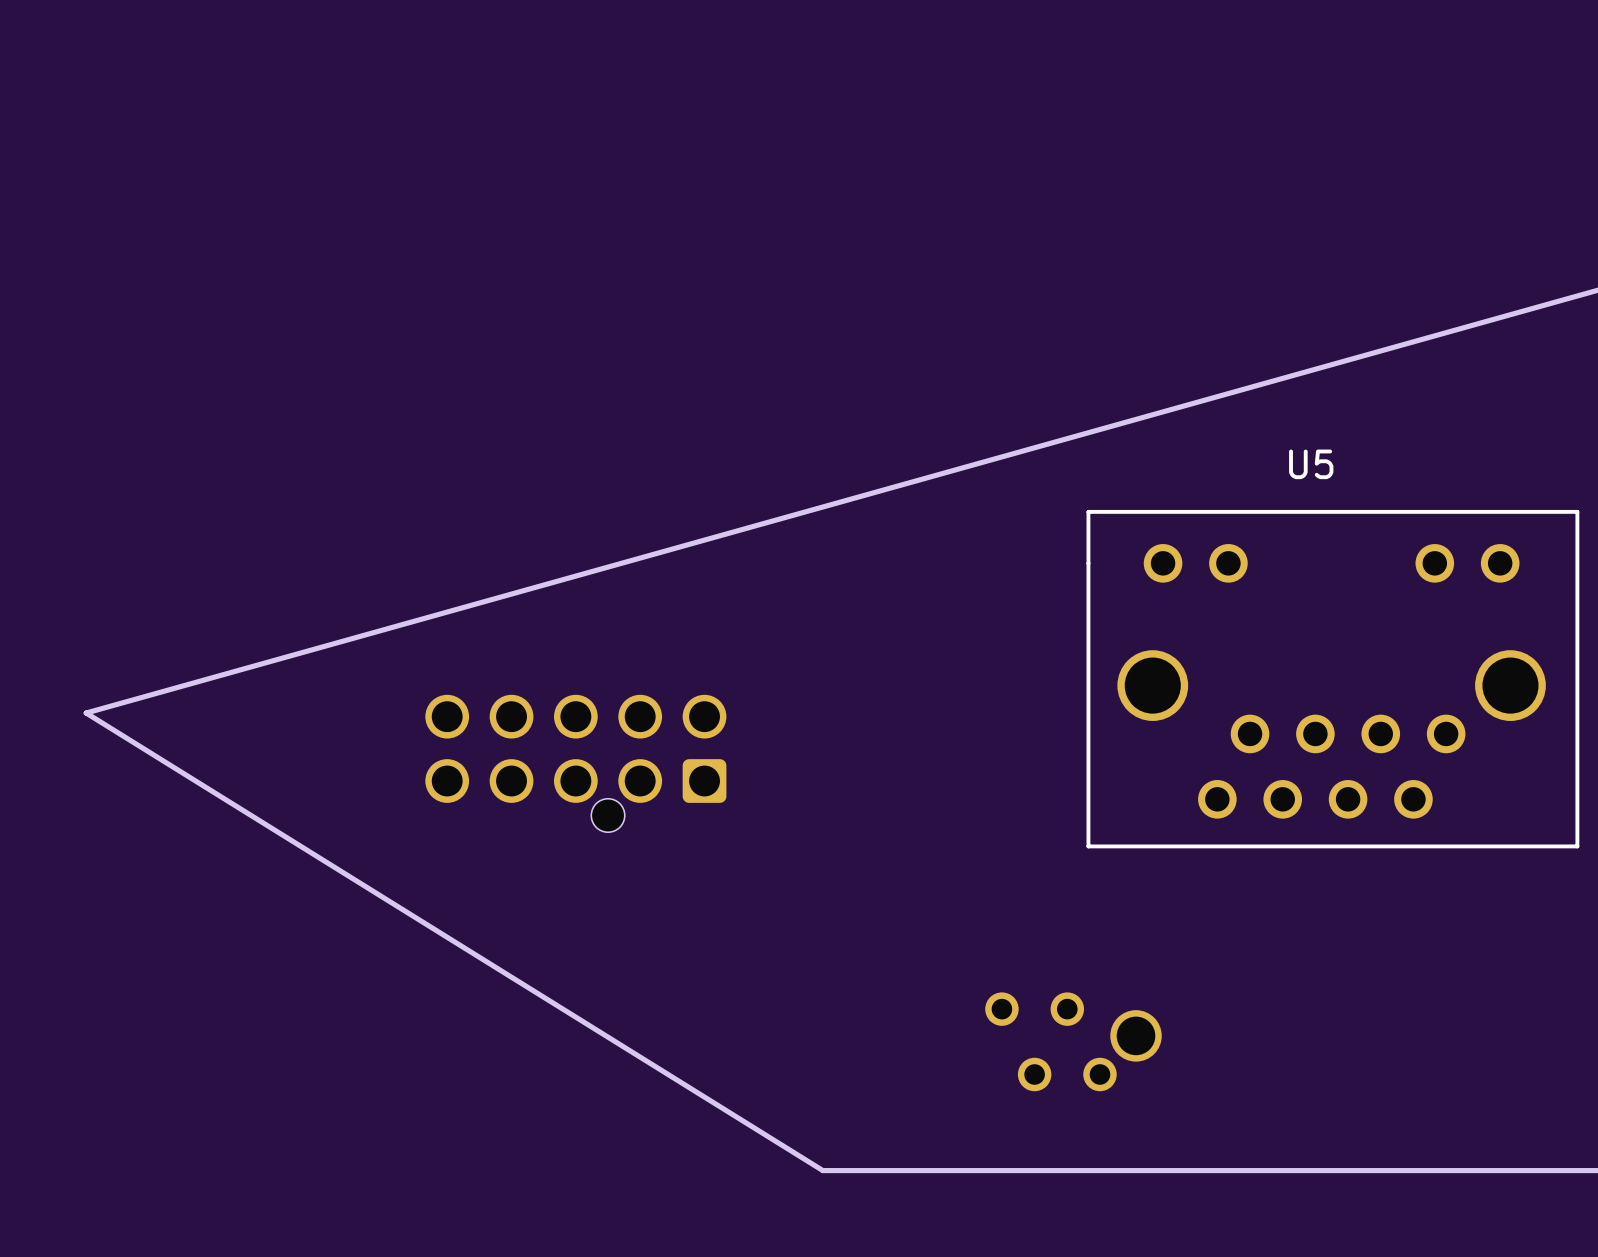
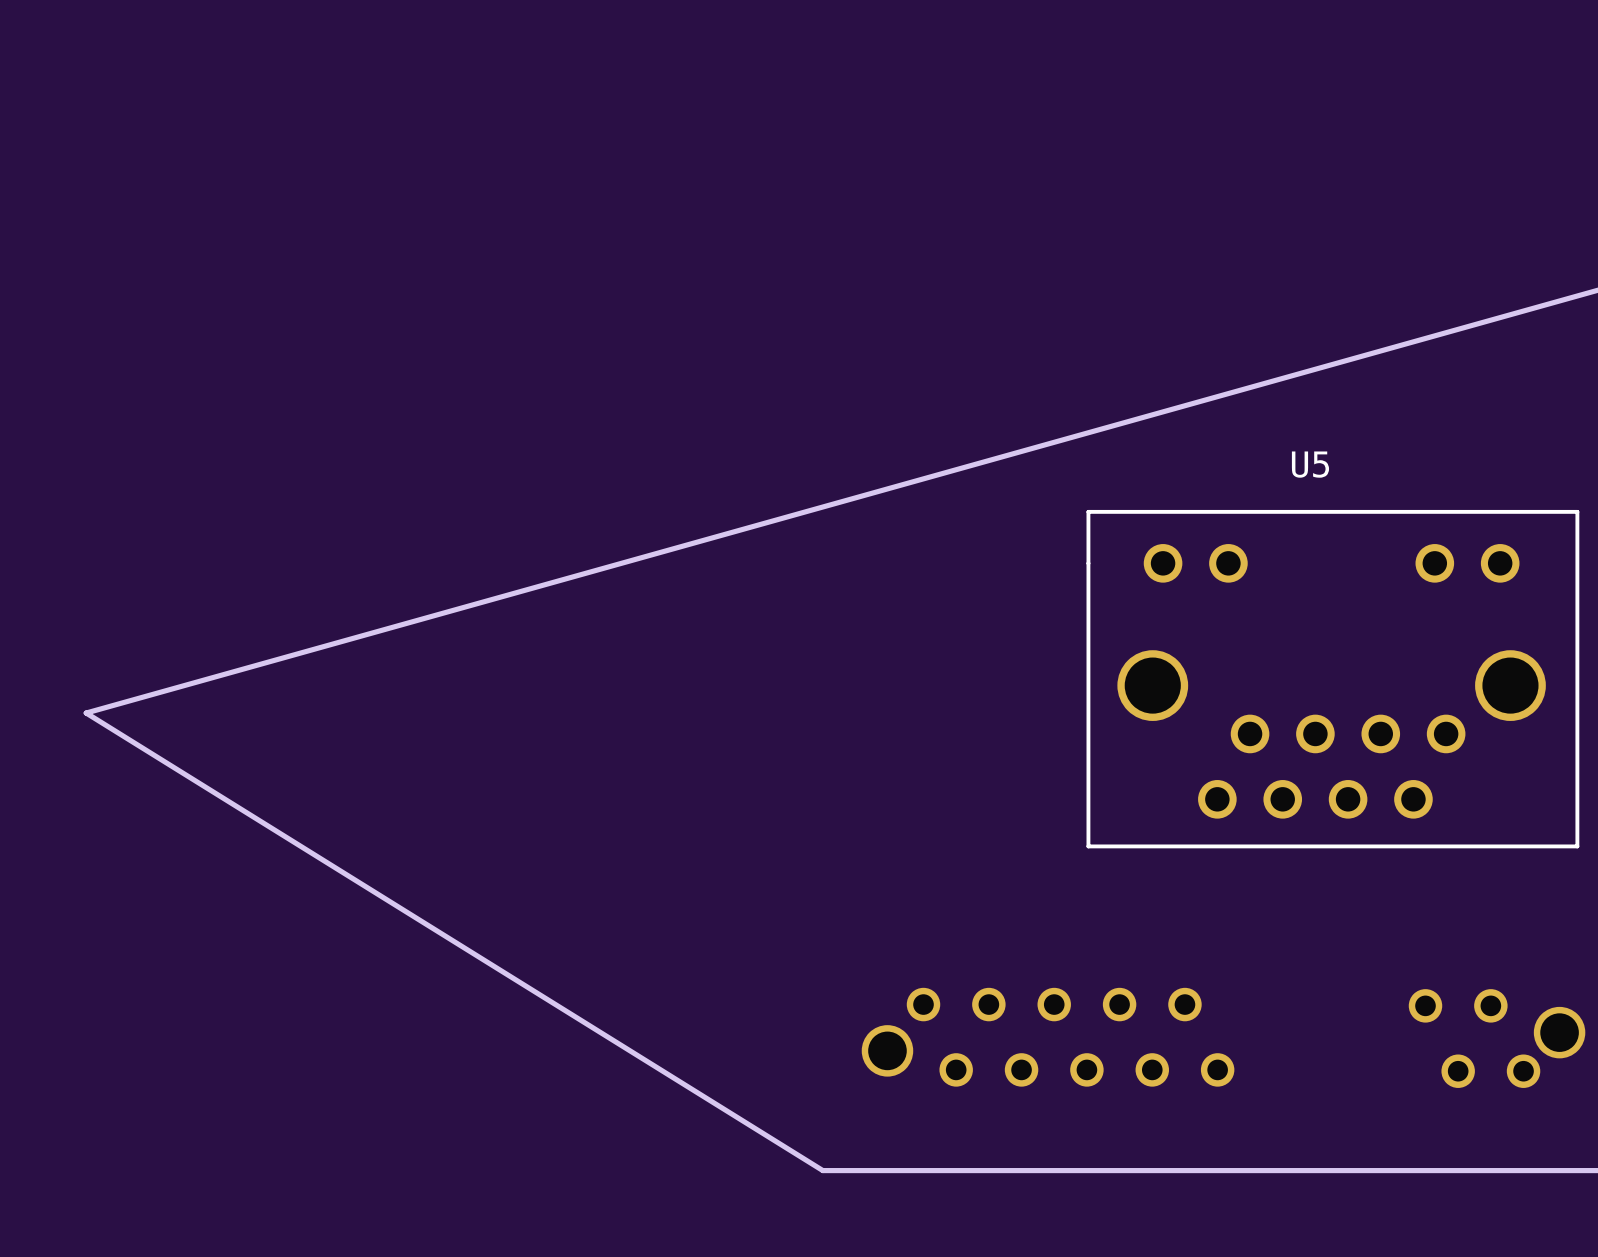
part: (575, 763) -> none
part: none -> (1048, 1037)
part position: (1073, 1041) -> (1497, 1038)

